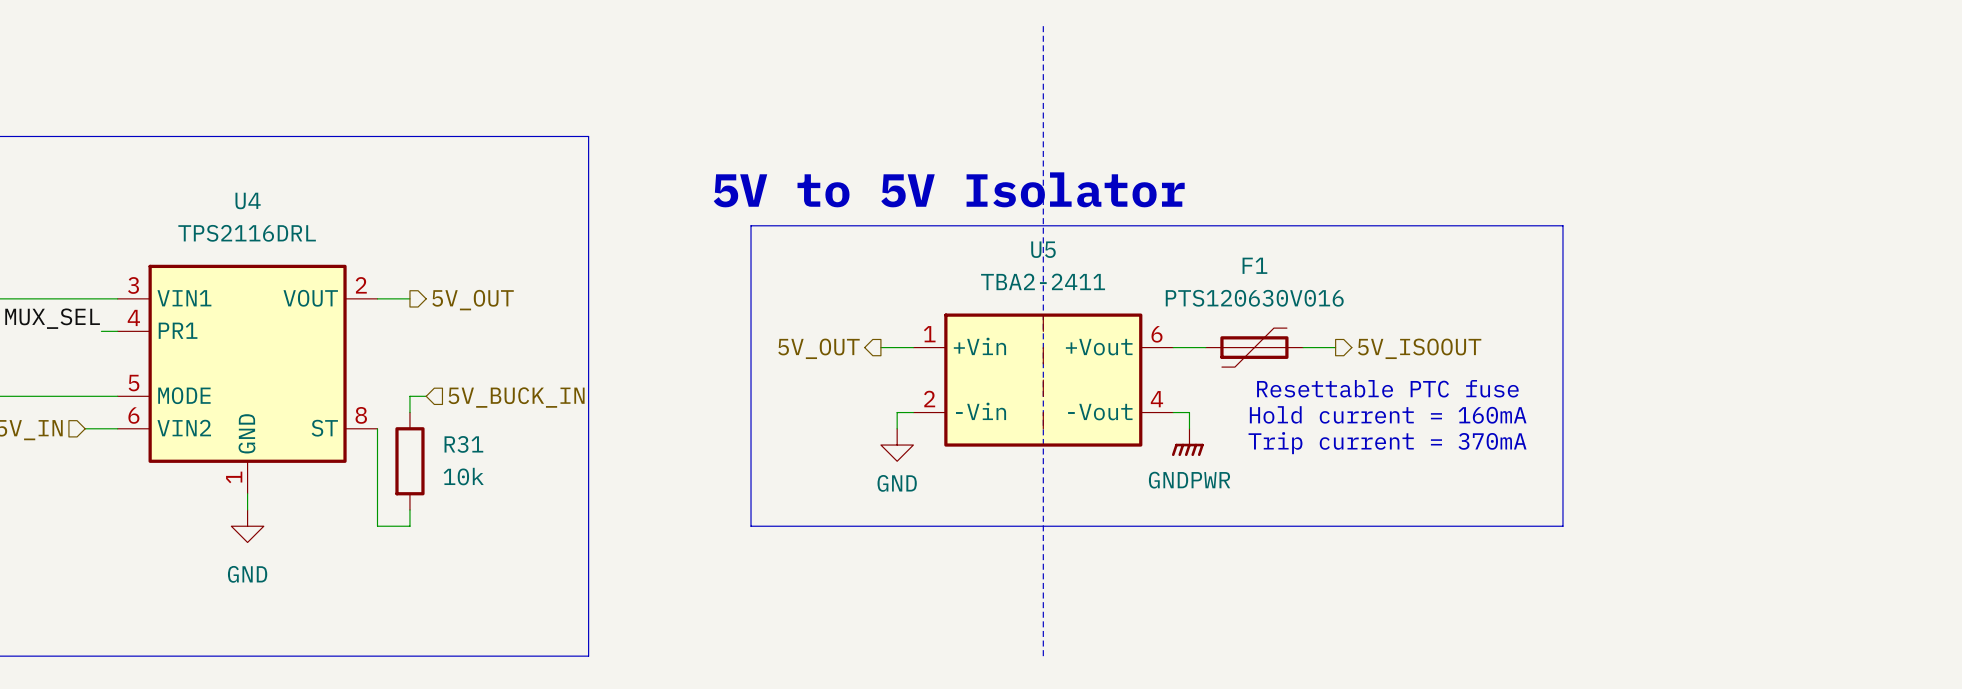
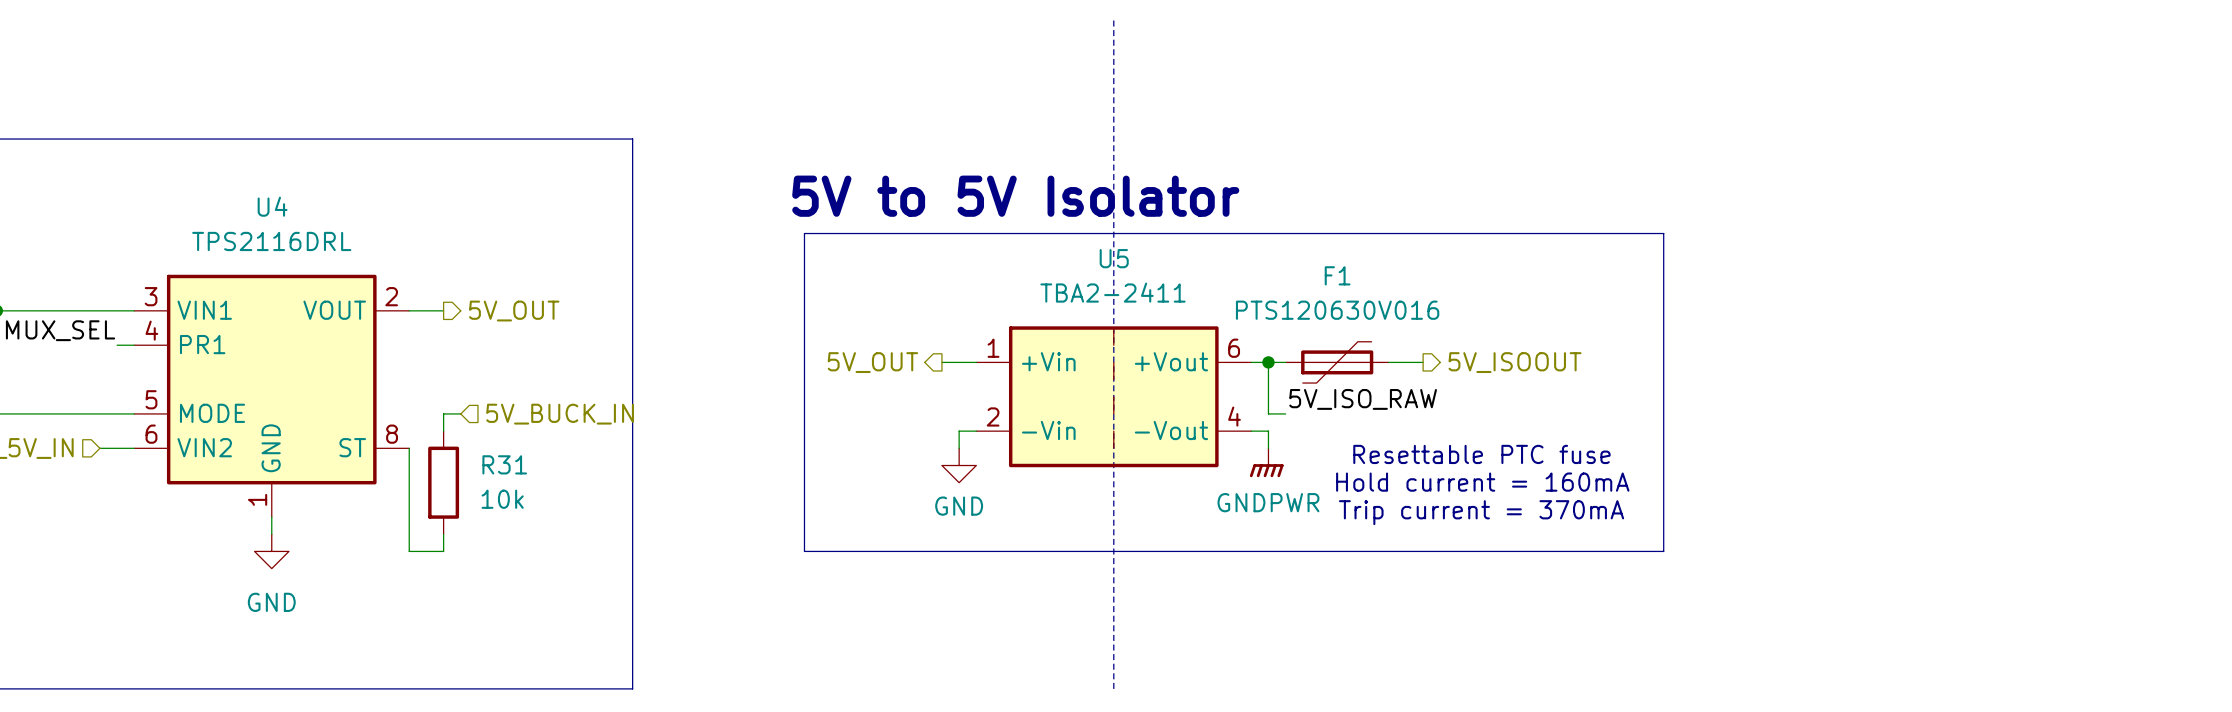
wire: none -> (1268, 362) (1268, 413) (1285, 413)
junction: none -> (1268, 362)
label: none -> 5V_ISO_RAW (1363, 399)
text: Resettable PTC fuse (1387, 388) -> none
text position: Hold current = 160mA (1388, 414) -> Hold current = 160mA (1482, 482)
text: Trip current = 370mA (1387, 443) -> Resettable PTC fuse (1481, 454)
text: none -> Trip current = 370mA (1481, 512)

